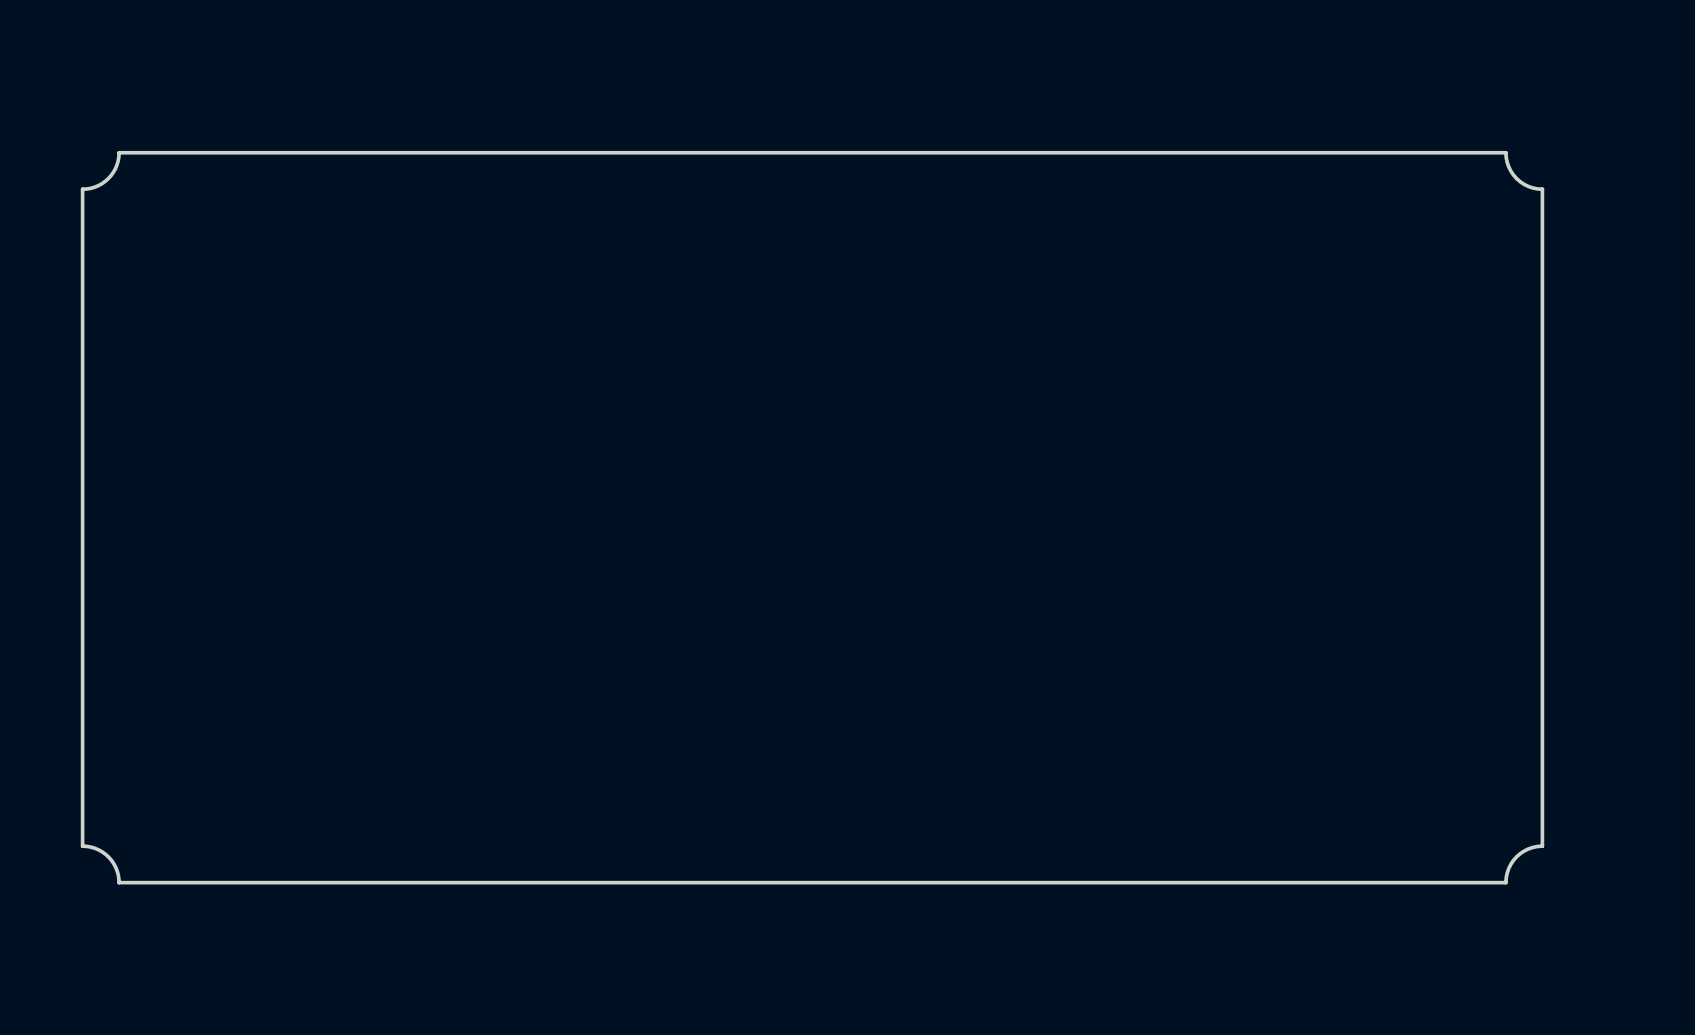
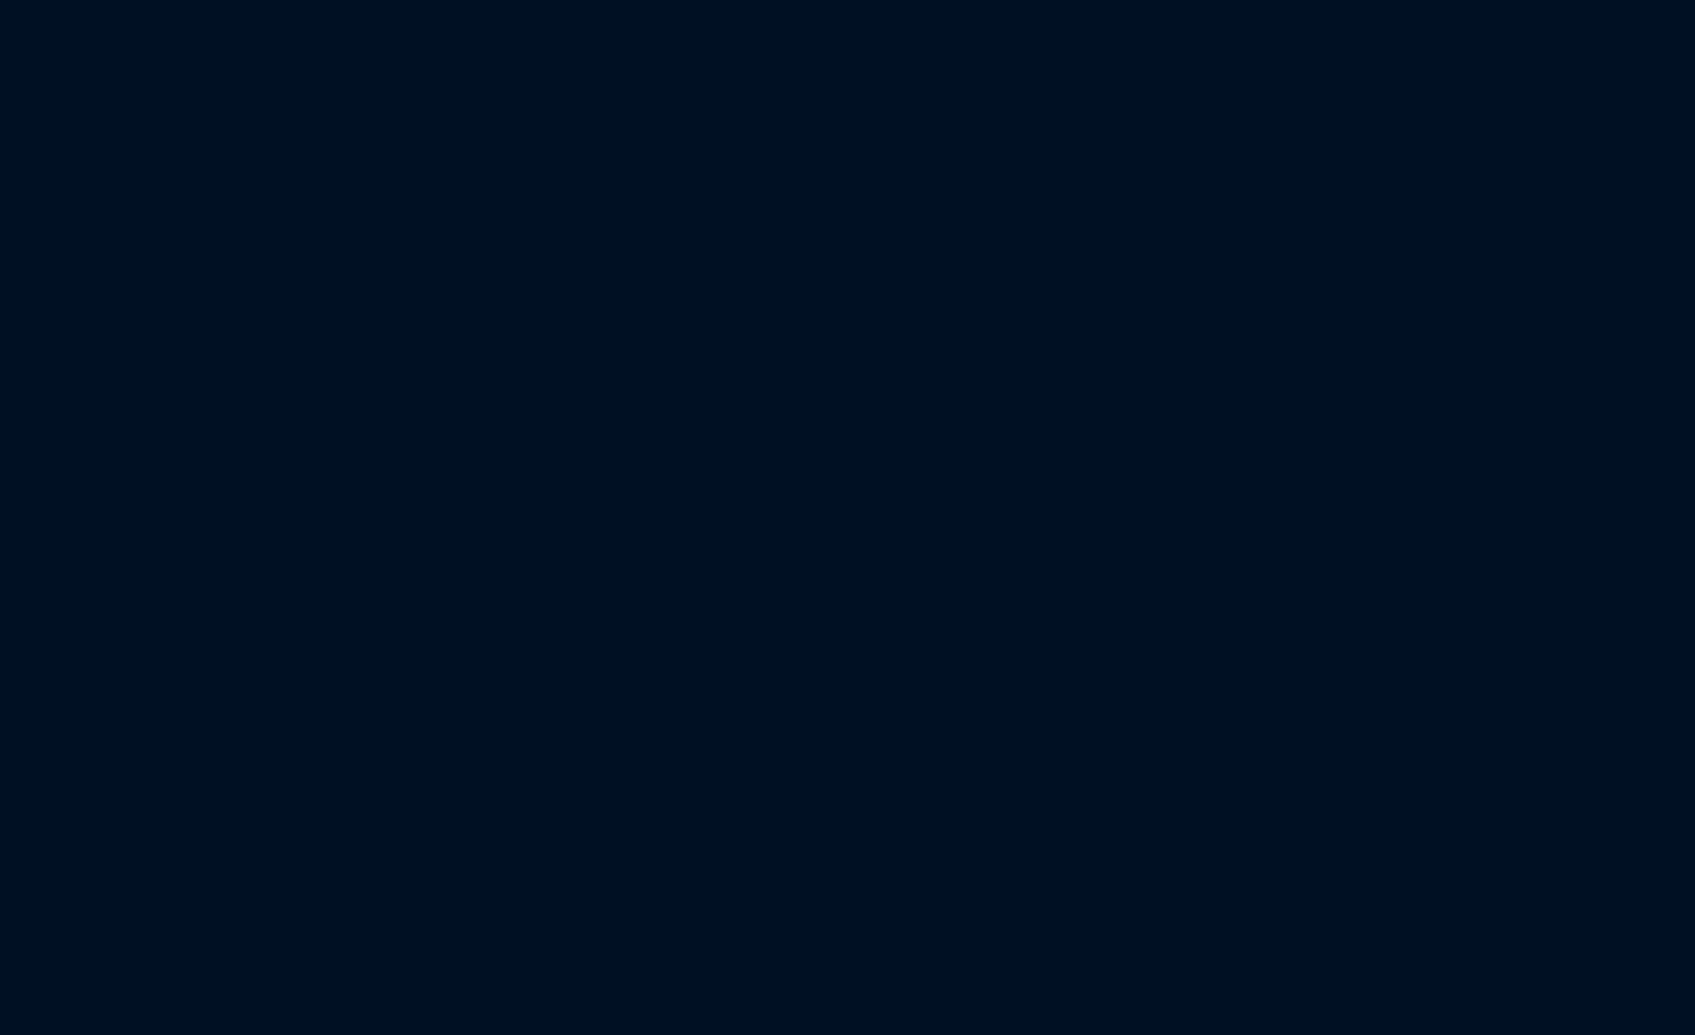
board edge: (1505, 152) (119, 152) (115, 168) (108, 178) (98, 185) (82, 189) (82, 846) (98, 849) (108, 856) (115, 866) (119, 882) (1505, 882) (1508, 868) (1516, 856) (1528, 848) (1542, 846) (1542, 189) (1528, 186) (1516, 178) (1508, 166) (1505, 152) -> none

